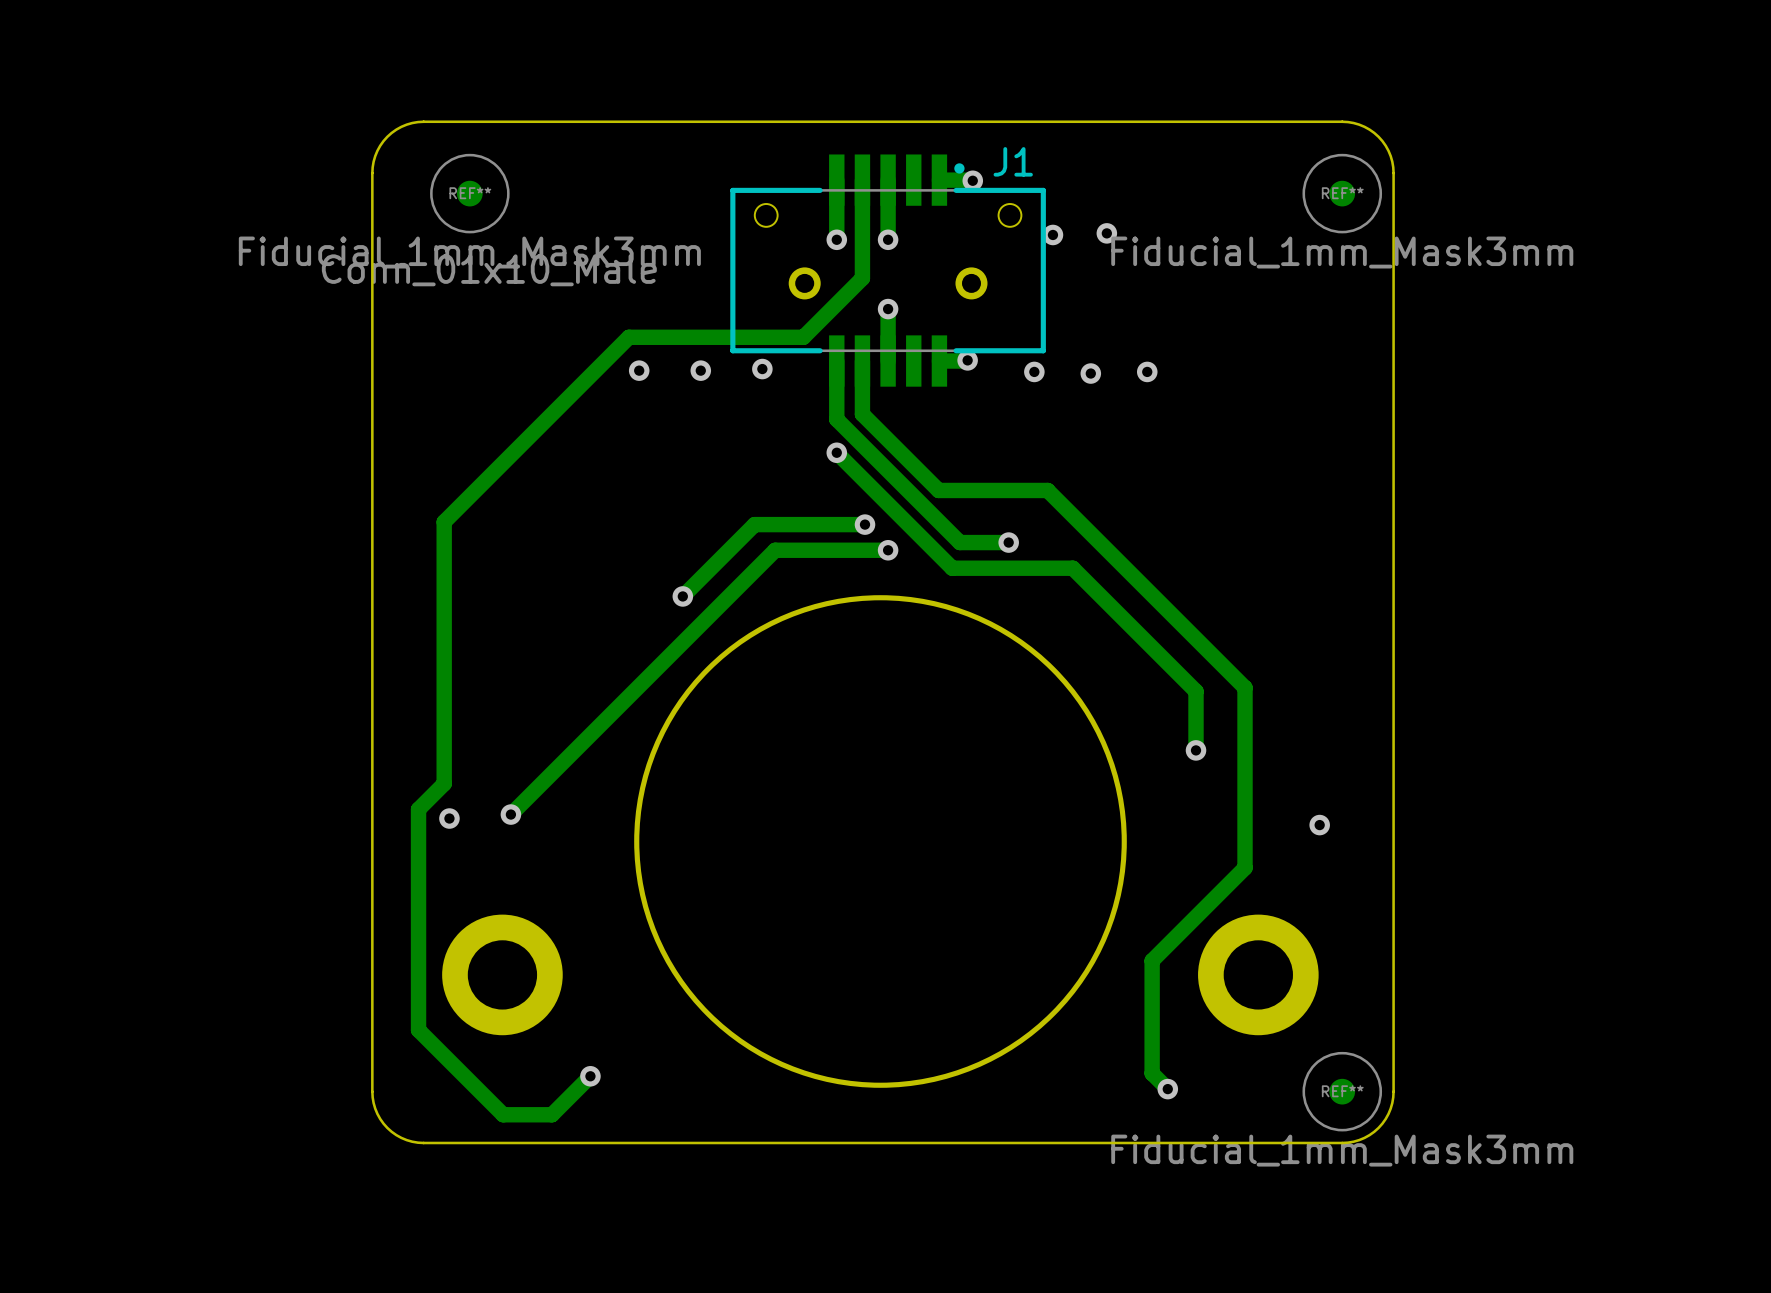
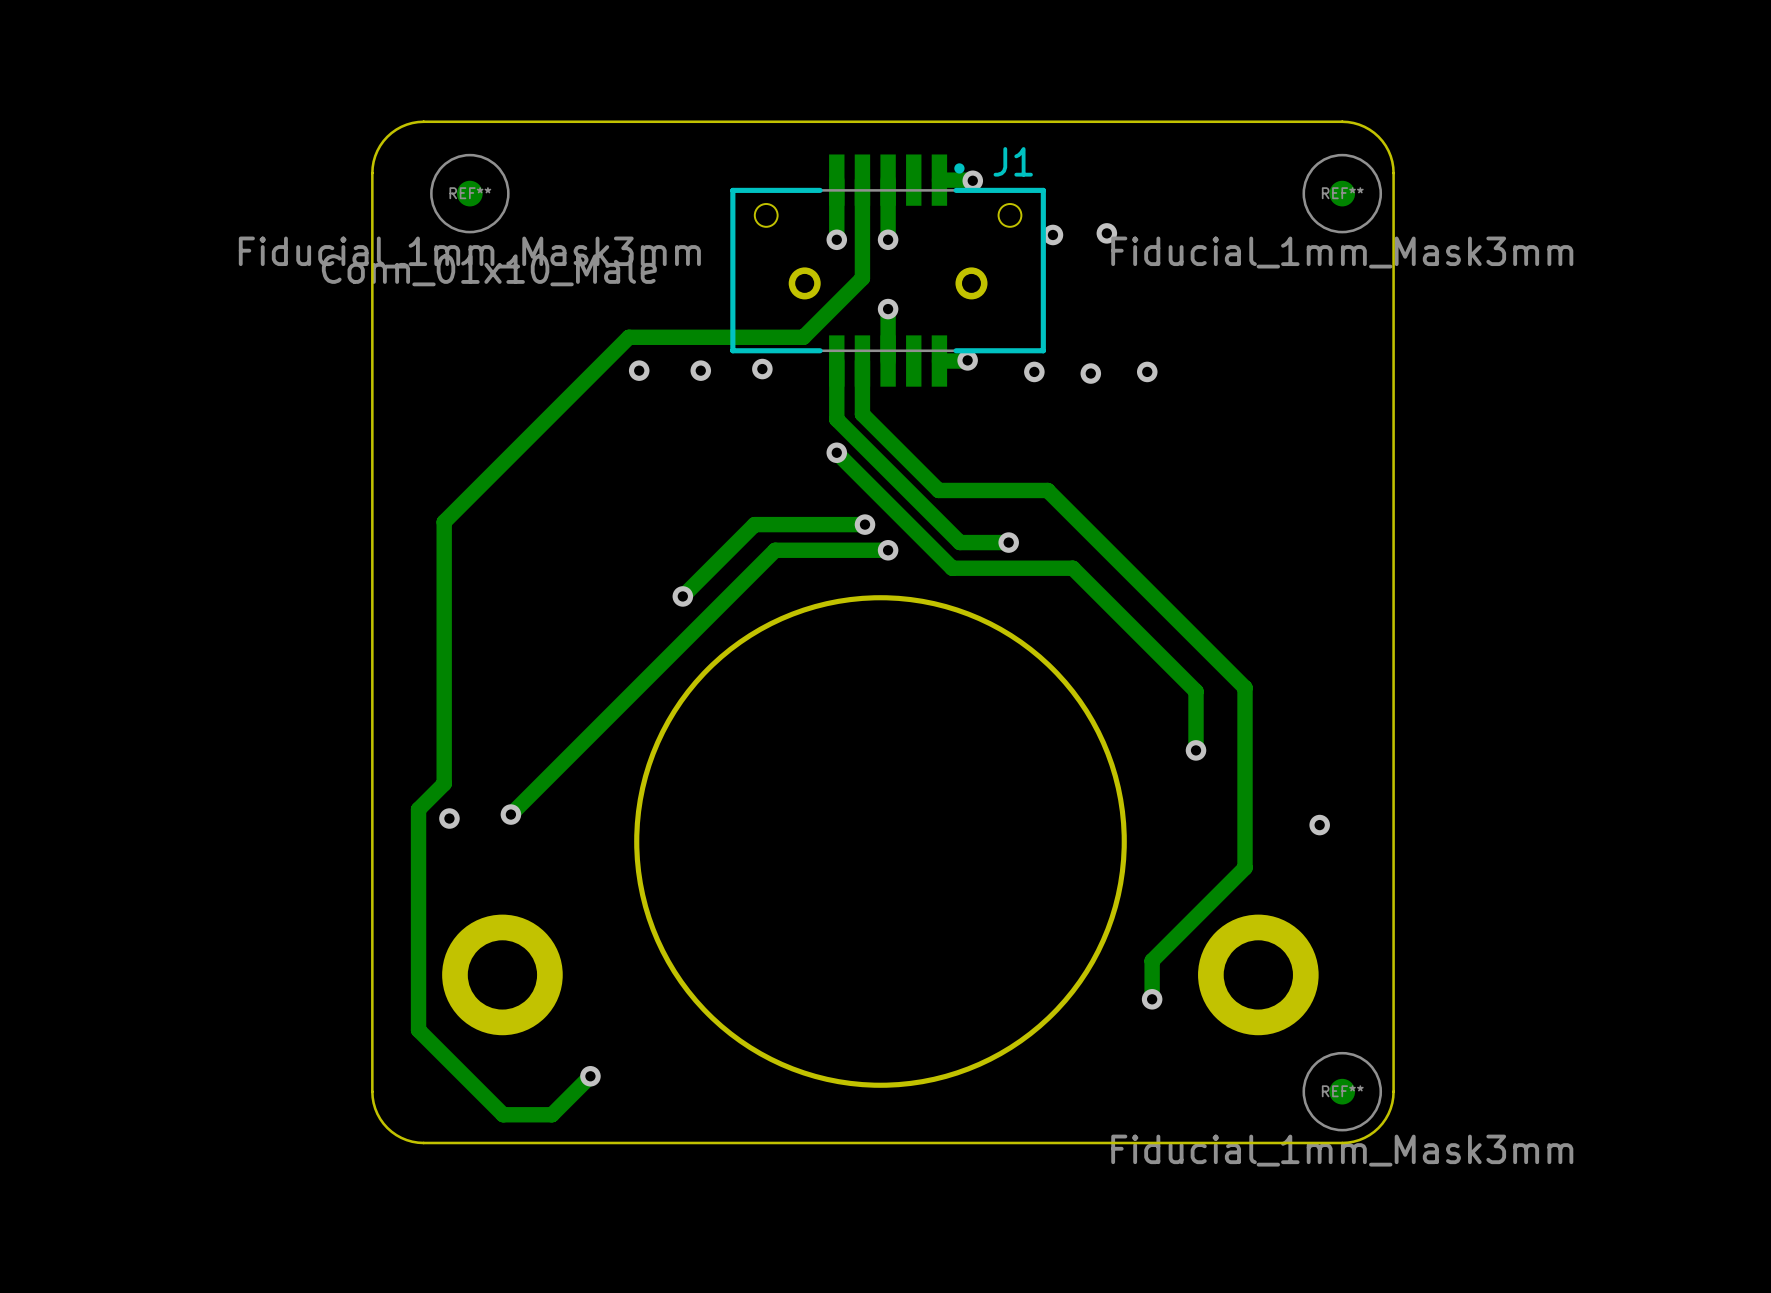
track: (1152, 999) (1152, 1073) (1167, 1089) -> none
via position: (1167, 1089) -> (1152, 999)

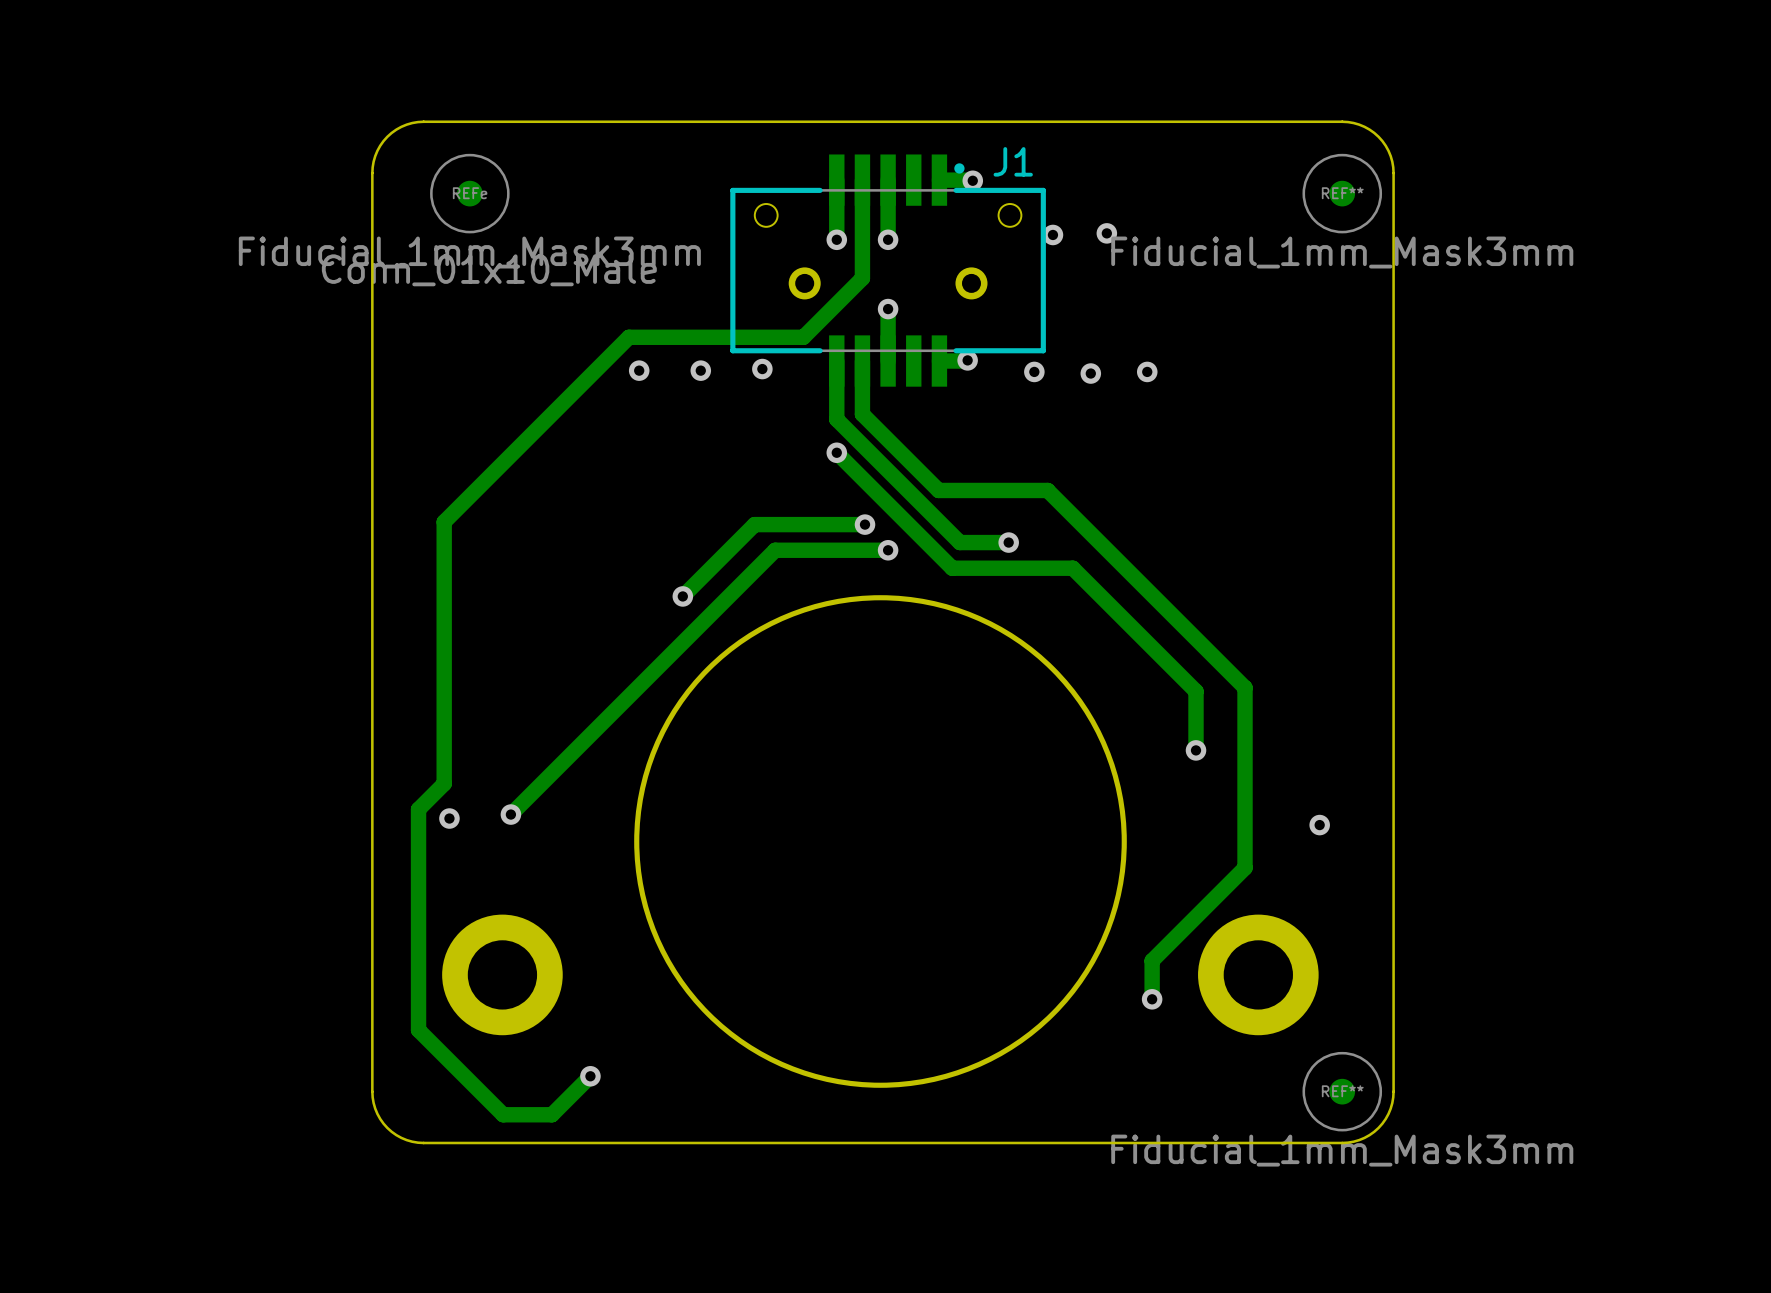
REF** name: REF** (470, 193) -> REFe (470, 193)

